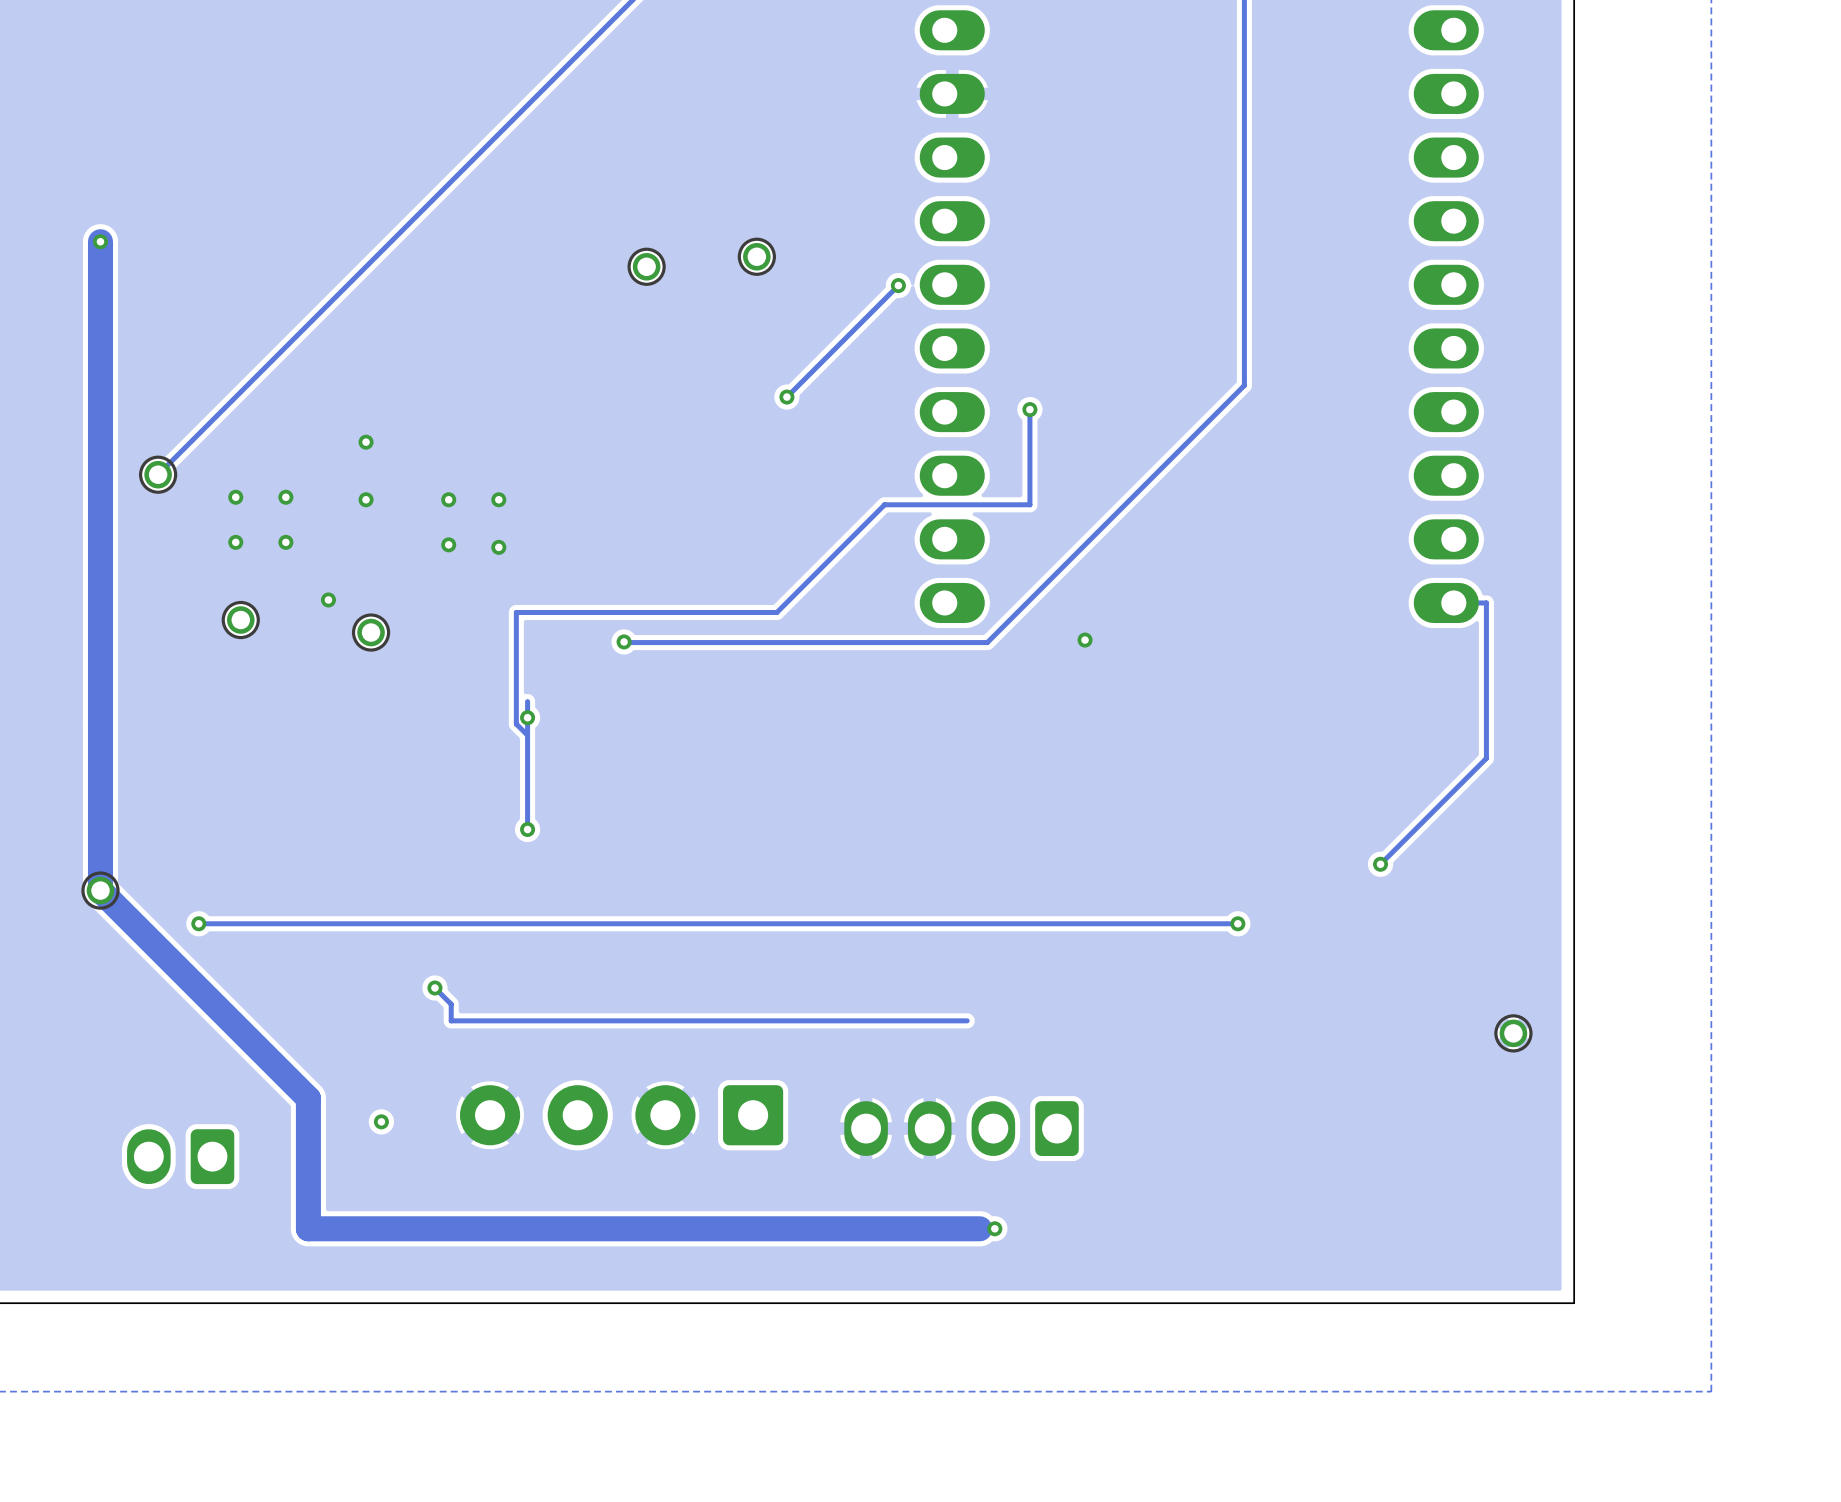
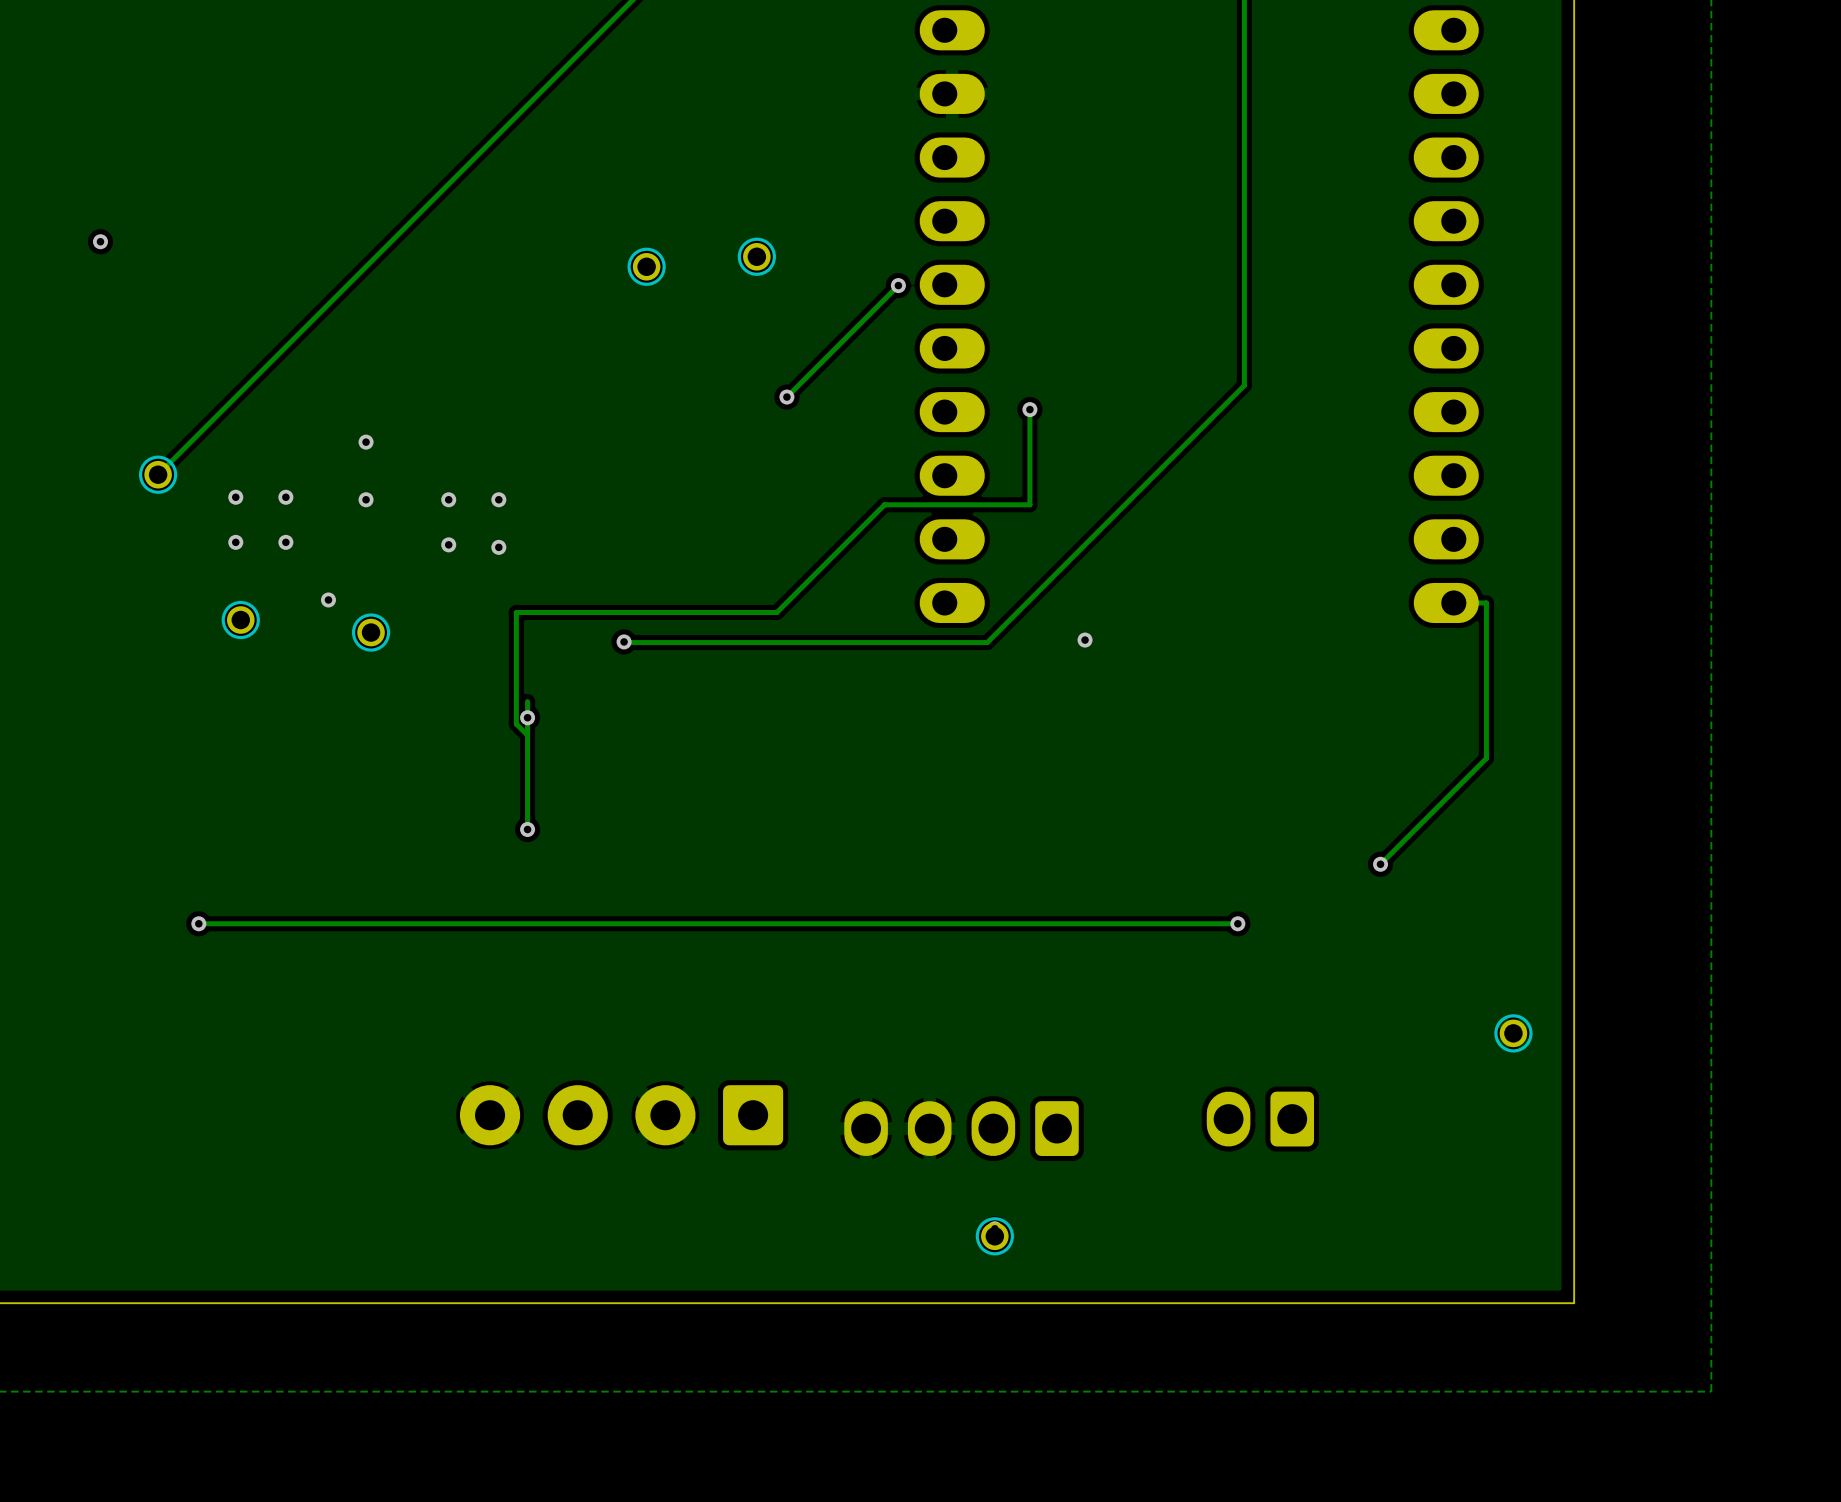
track: (100, 241) (100, 890) (308, 1098) (308, 1228) (979, 1228) -> none
part: (100, 890) -> none
track: (434, 987) (451, 1004) (451, 1020) (967, 1020) -> none
via: (434, 987) -> none
part: none -> (1260, 1119)
via: (381, 1121) -> none
part: (180, 1156) -> none
part: none -> (994, 1236)

